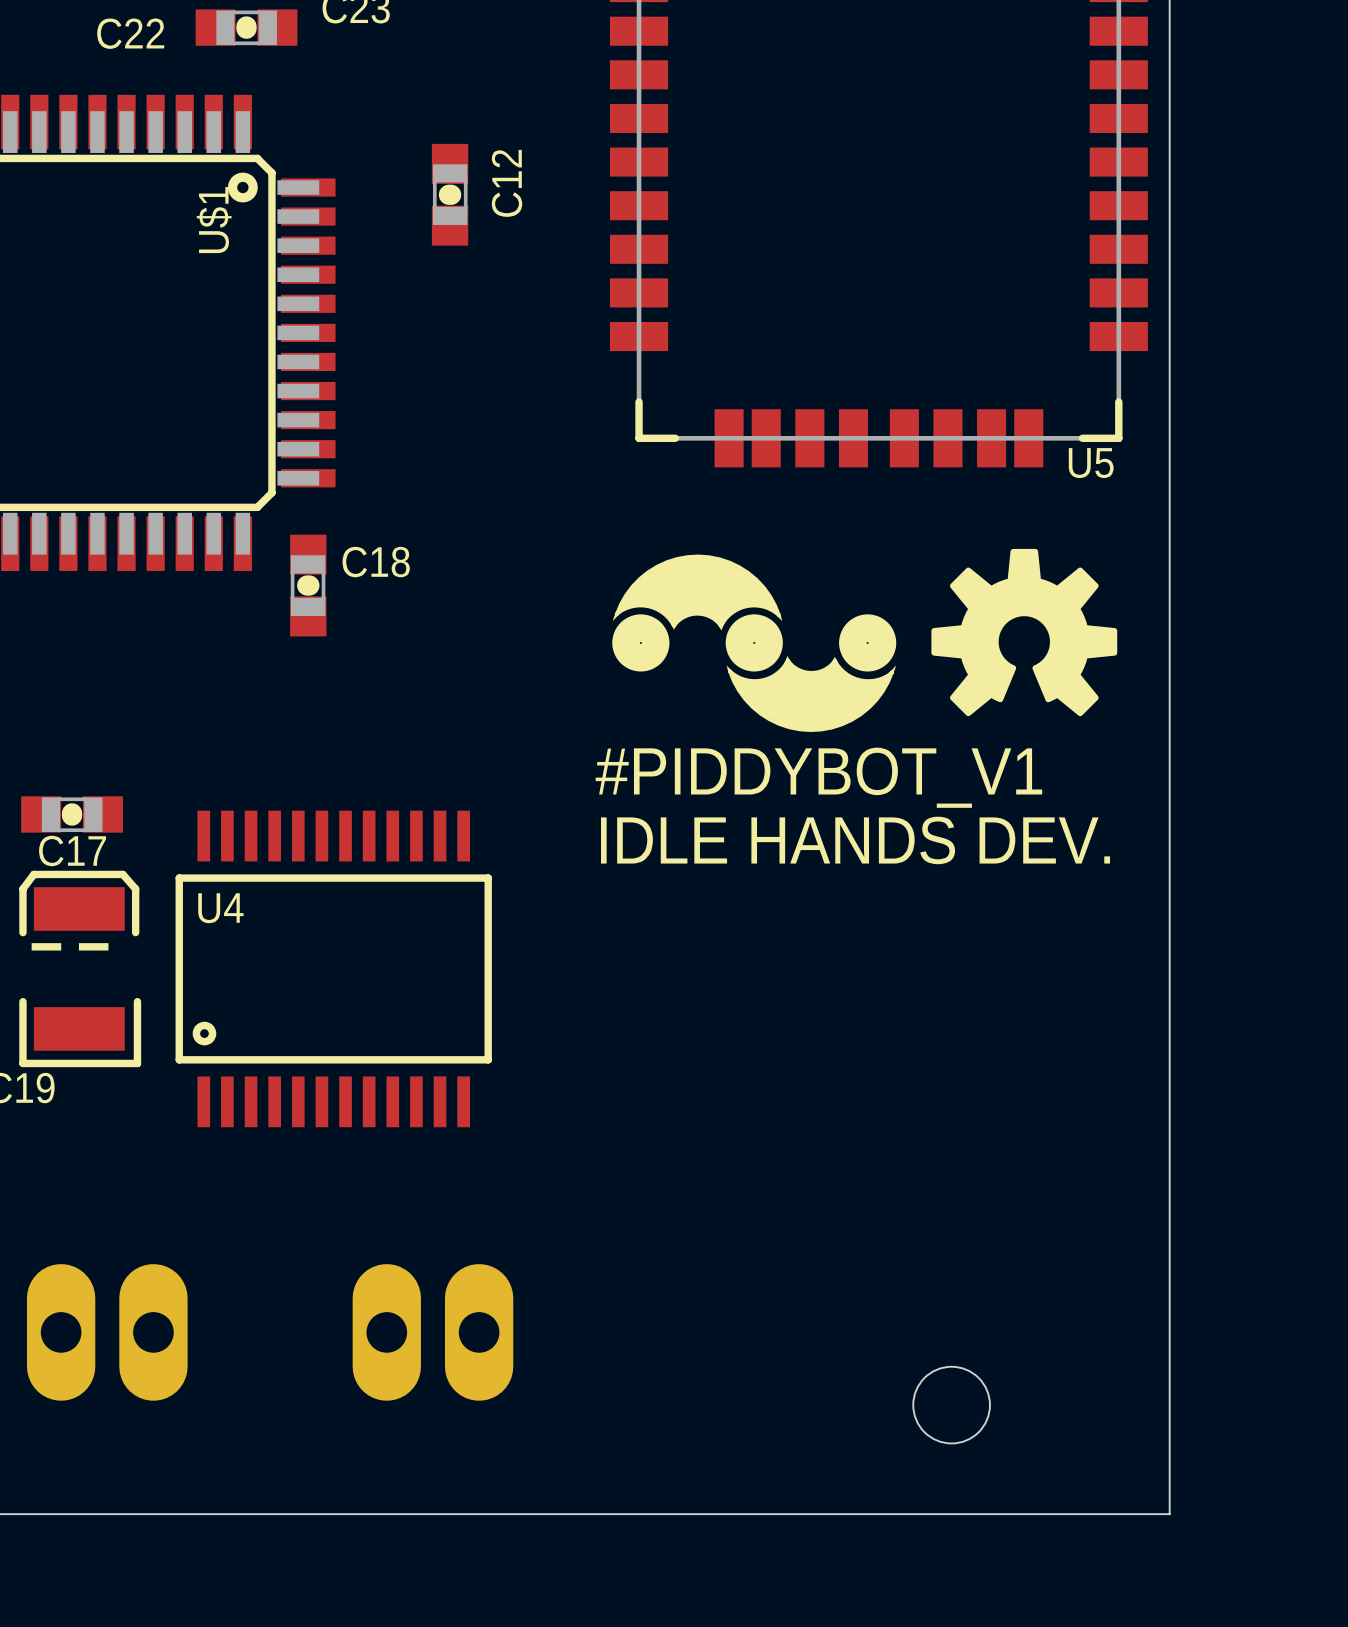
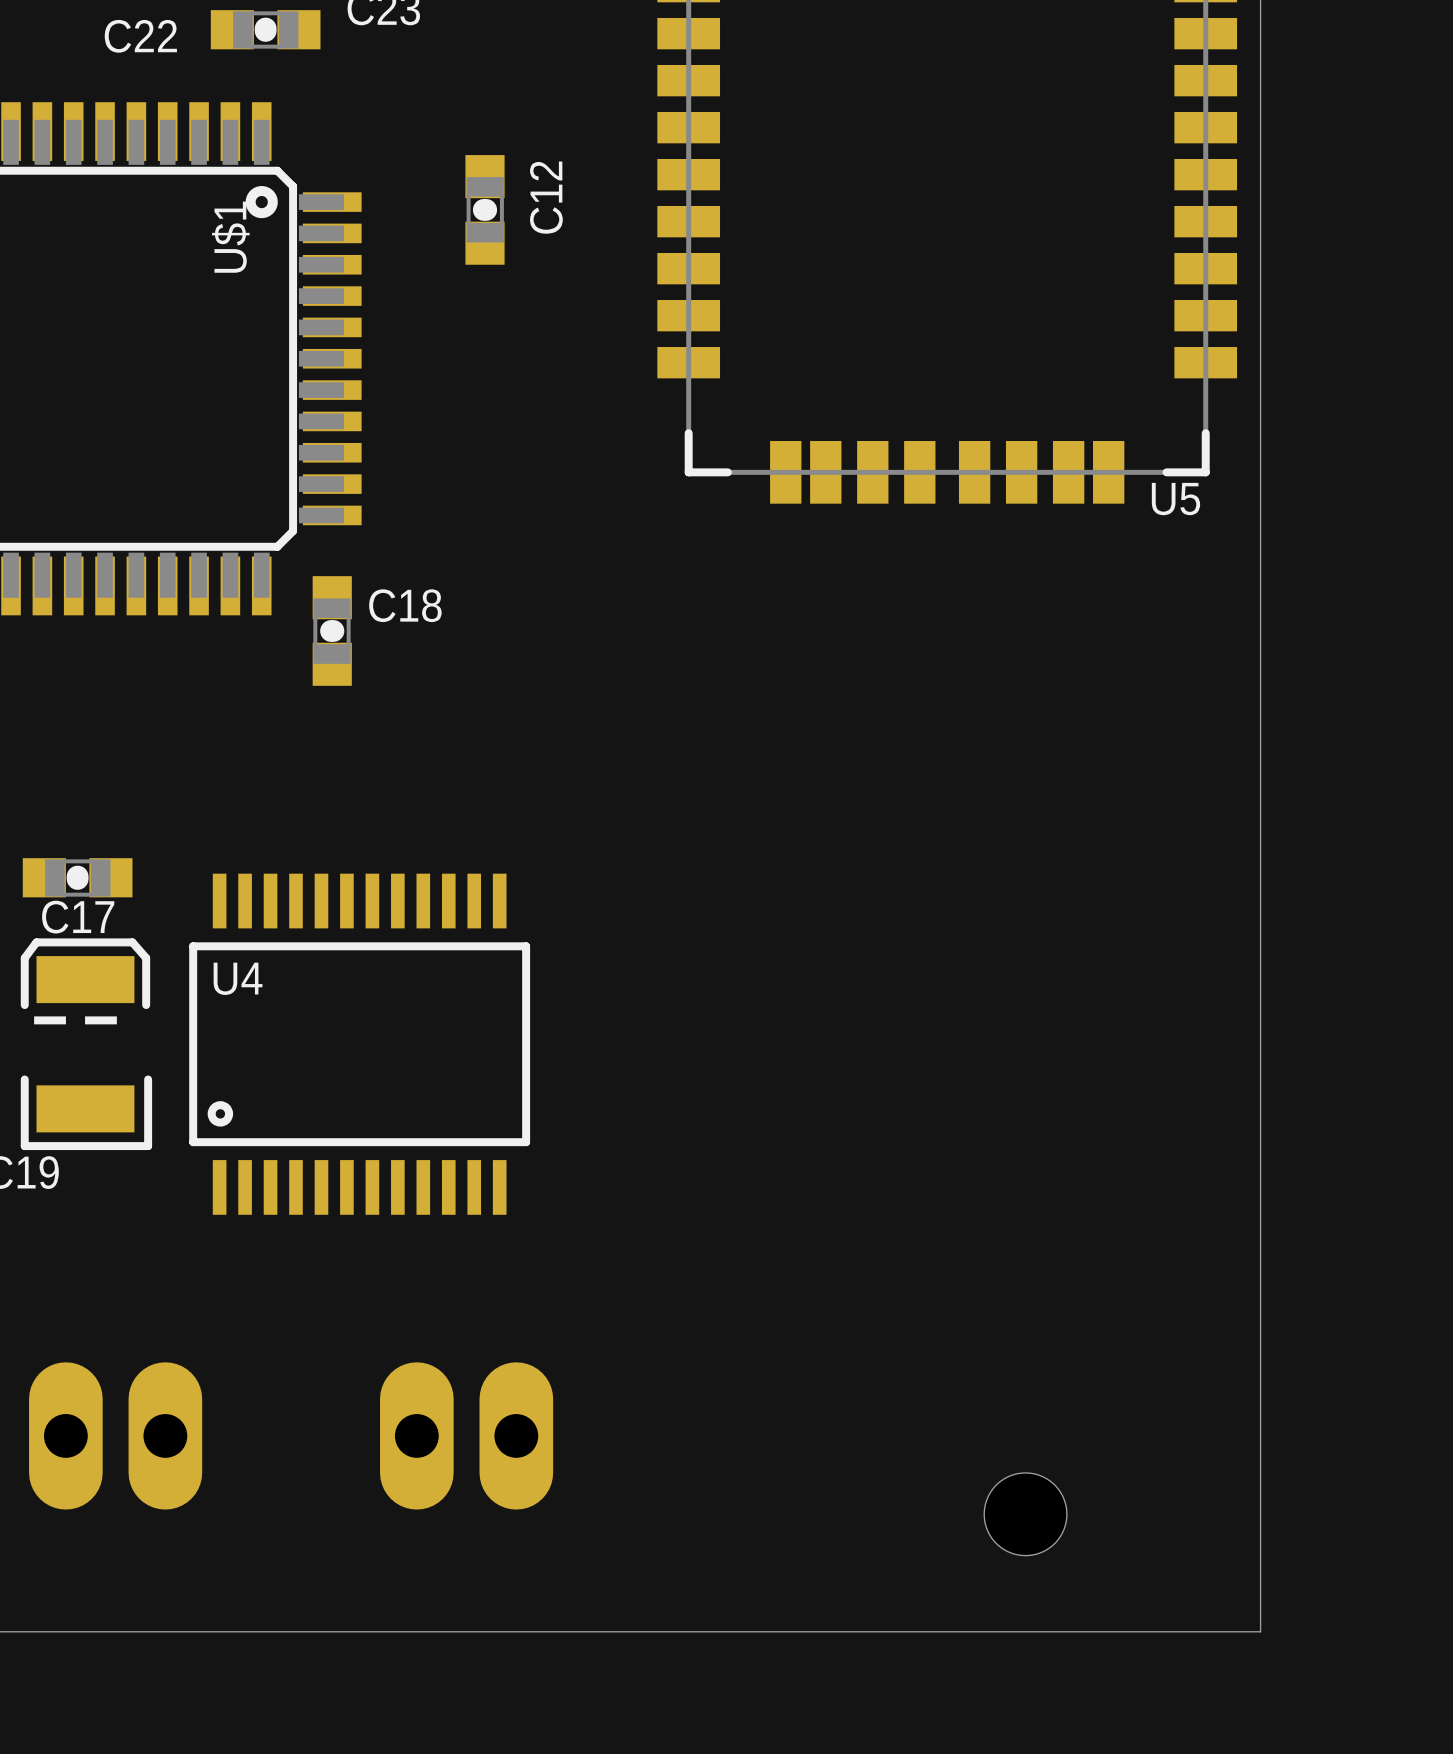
drawing: [612, 548, 1118, 733] -> none
text: #PIDDYBOT_V1 (818, 777) -> none
text: IDLE HANDS DEV. (855, 840) -> none

